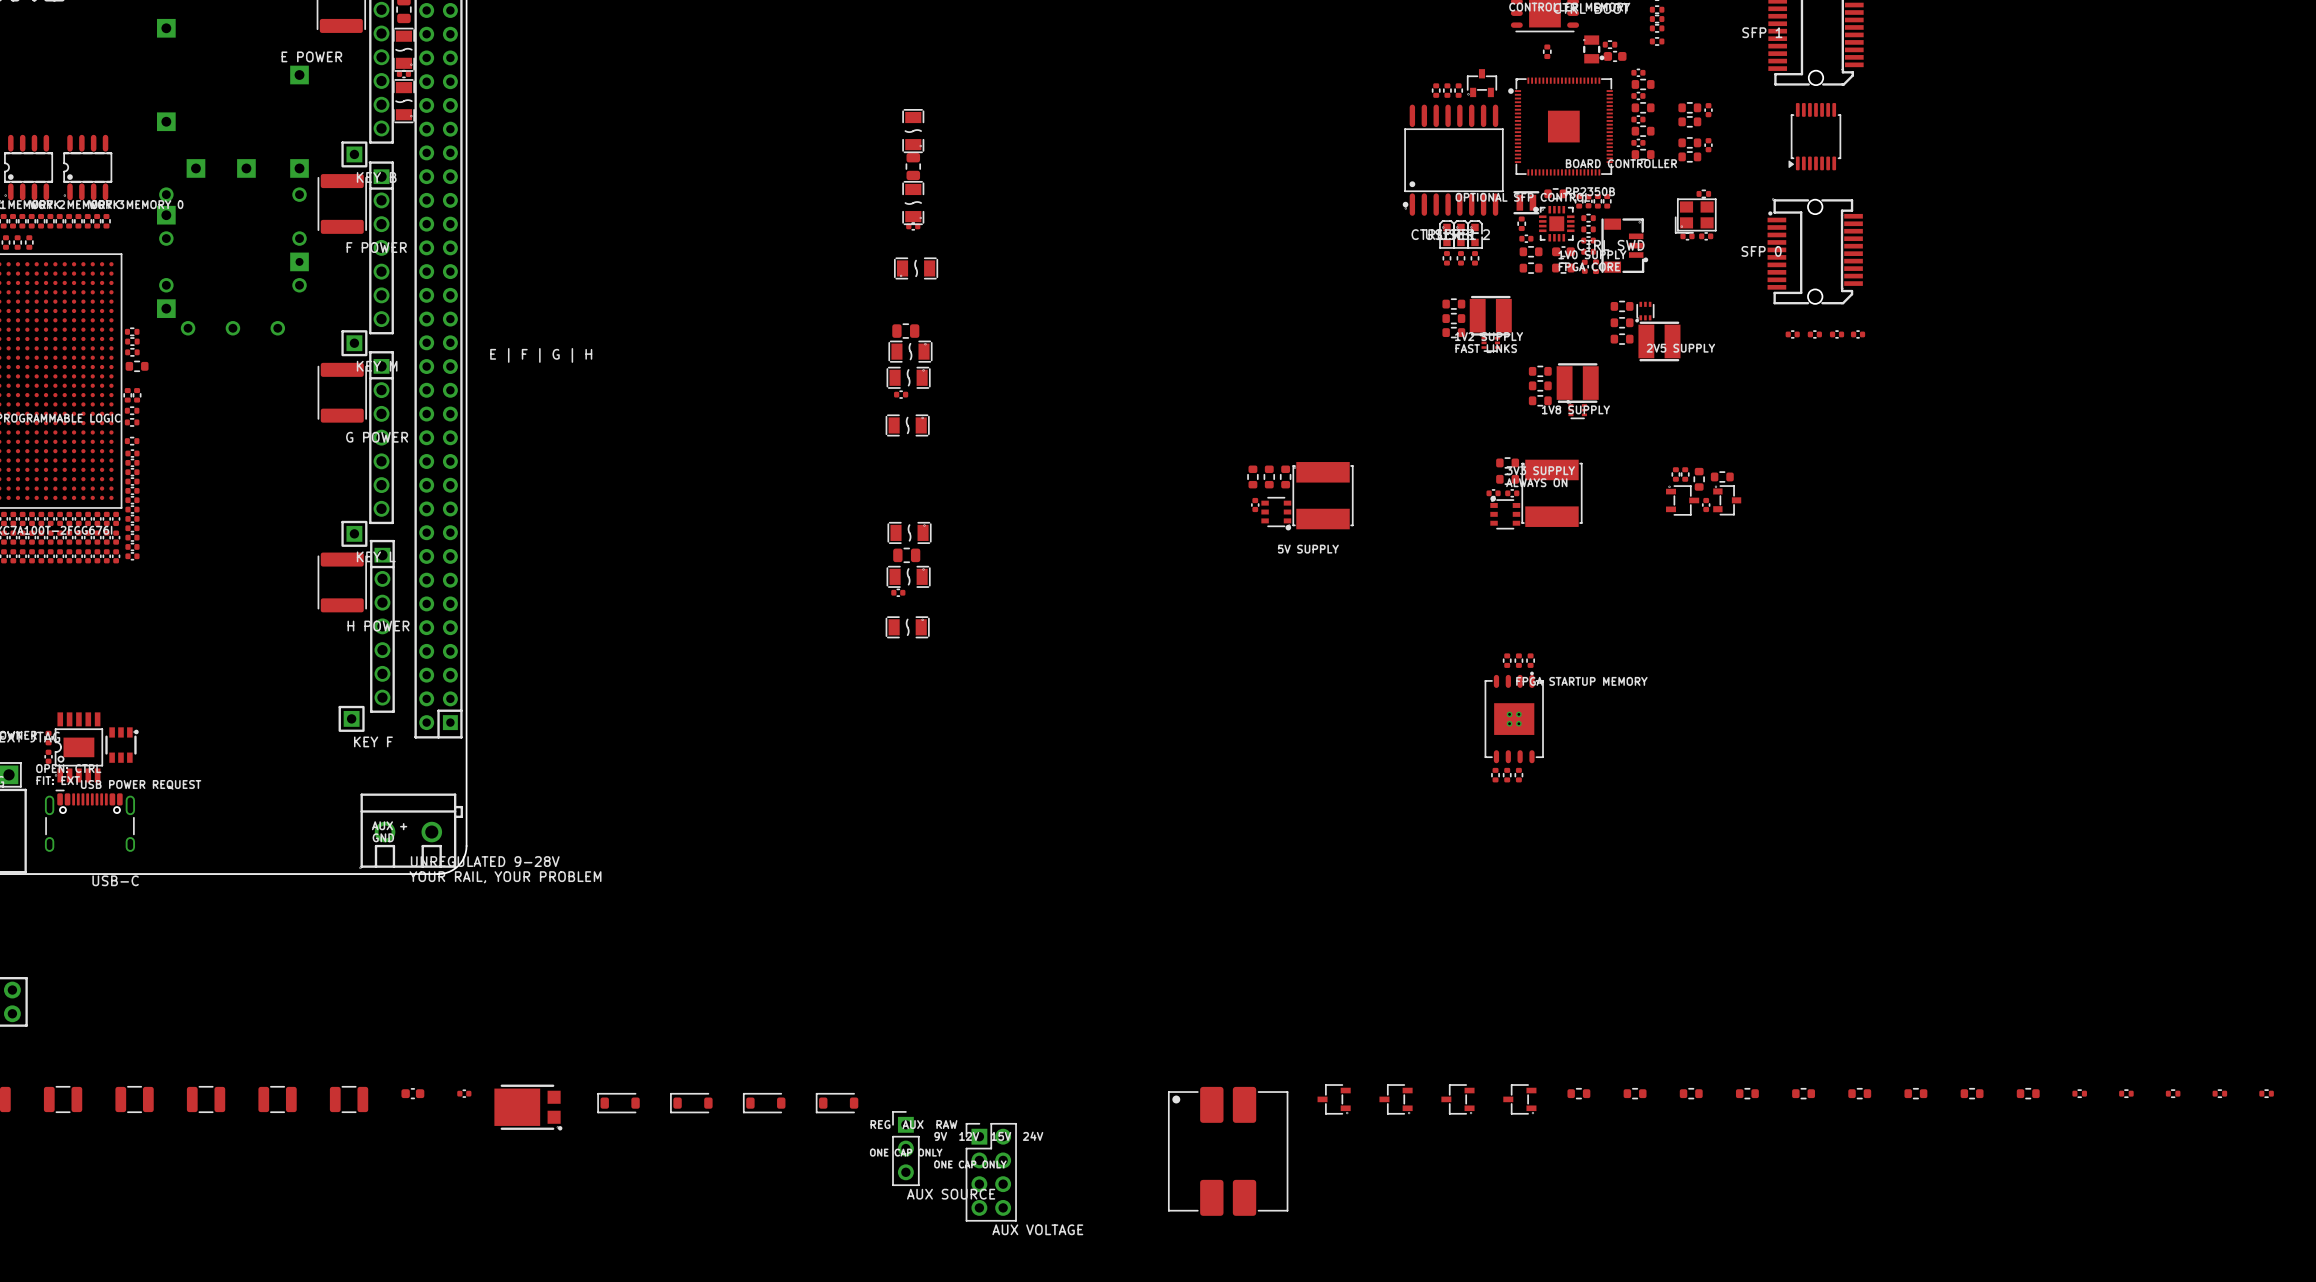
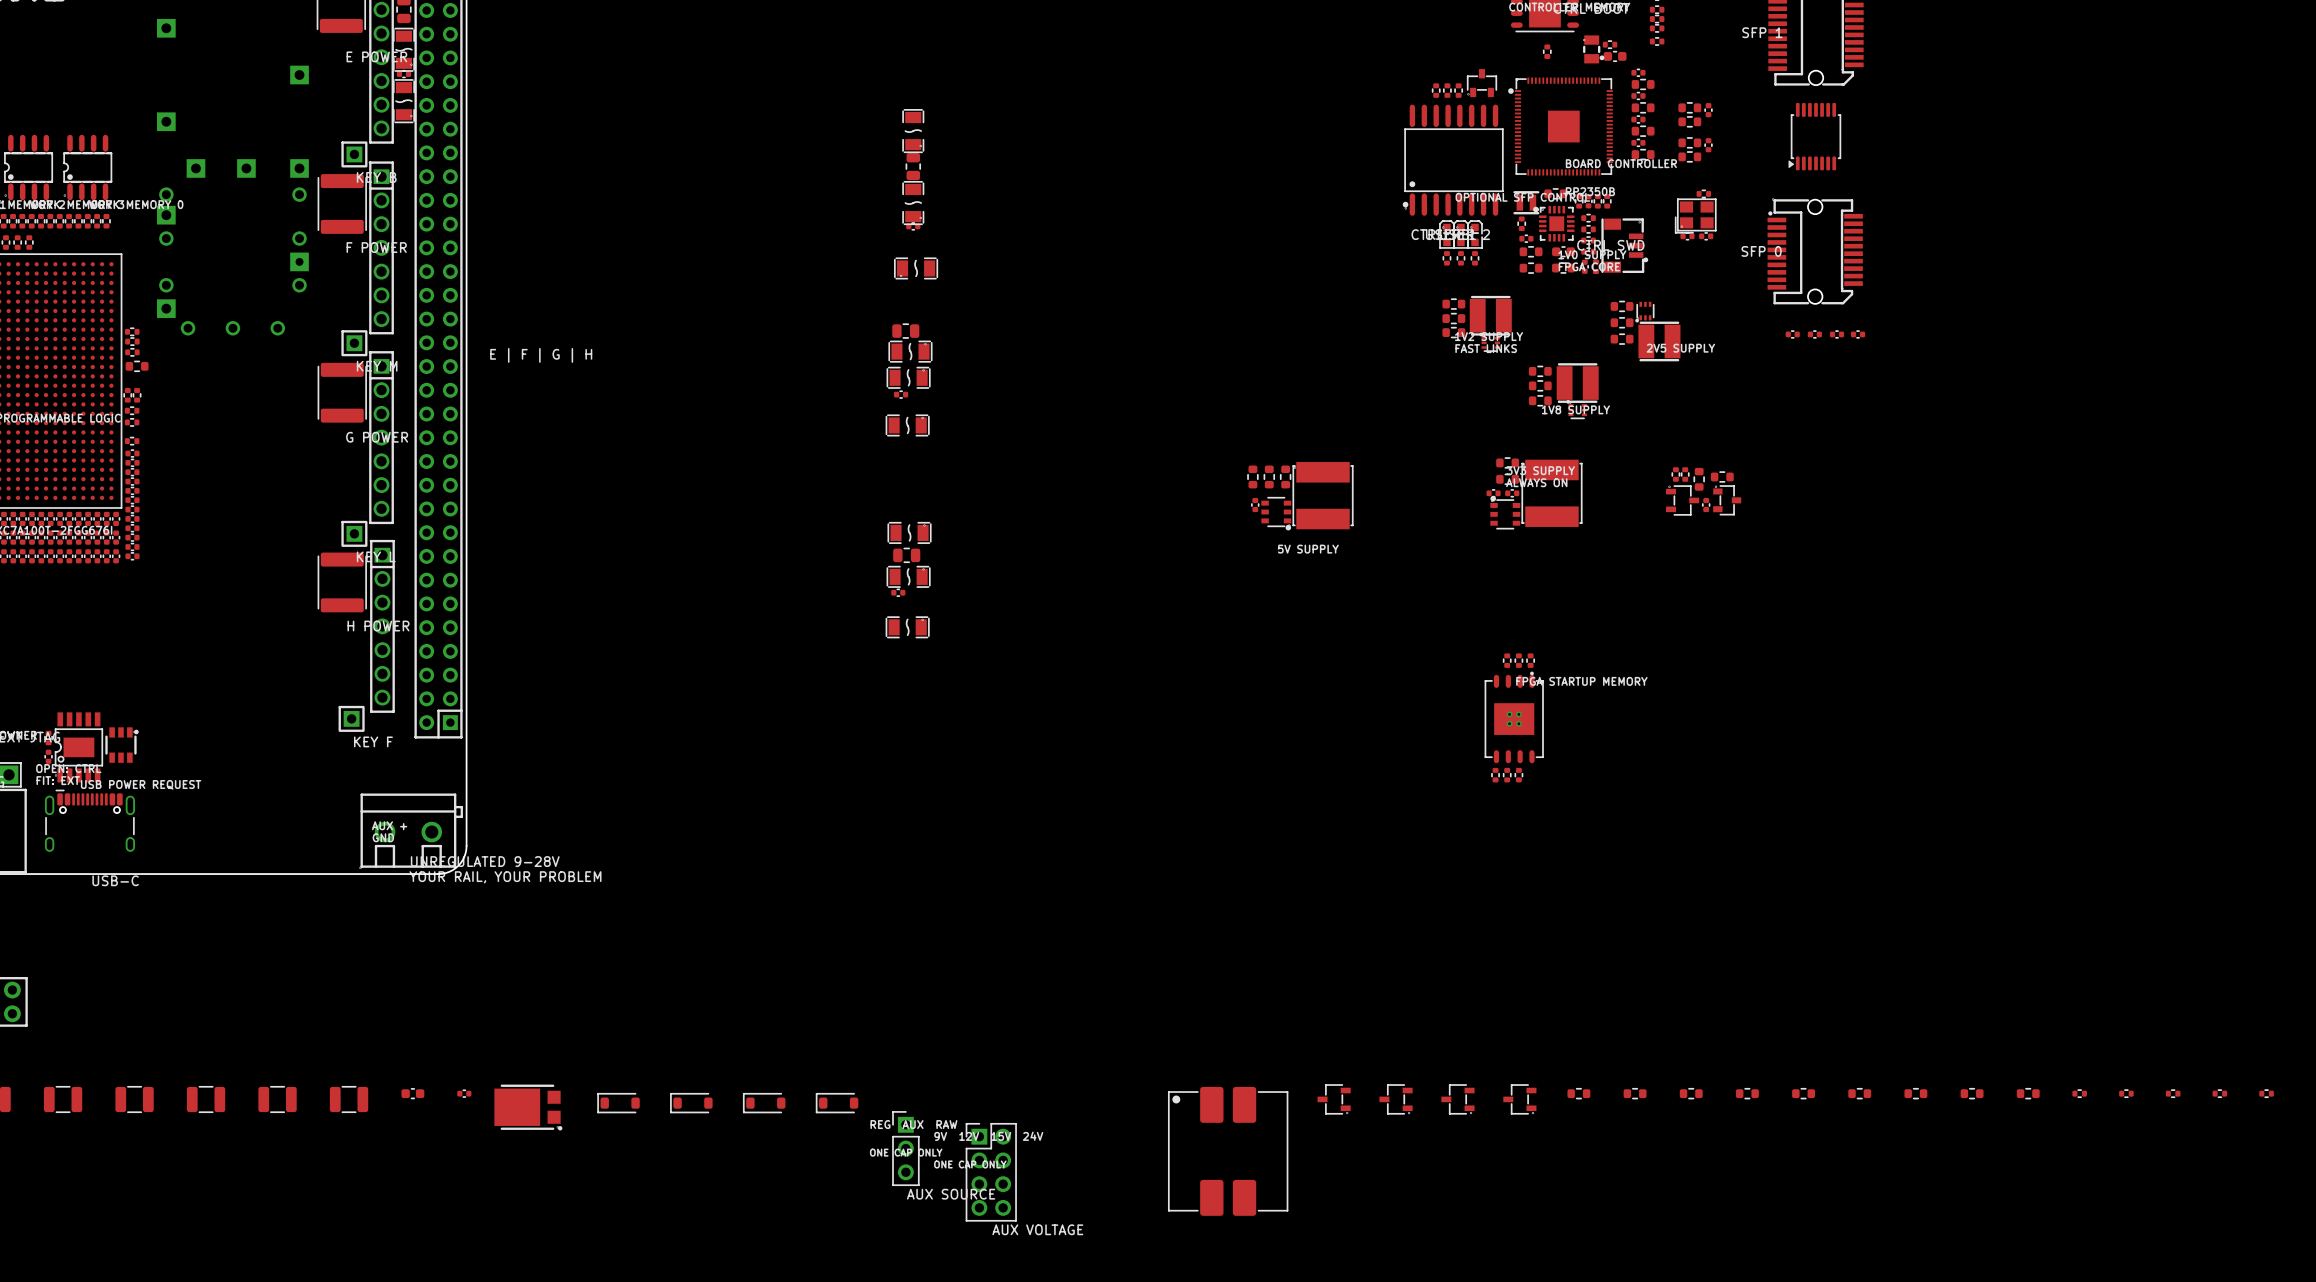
part text position: E POWER (311, 56) -> E POWER (376, 56)

